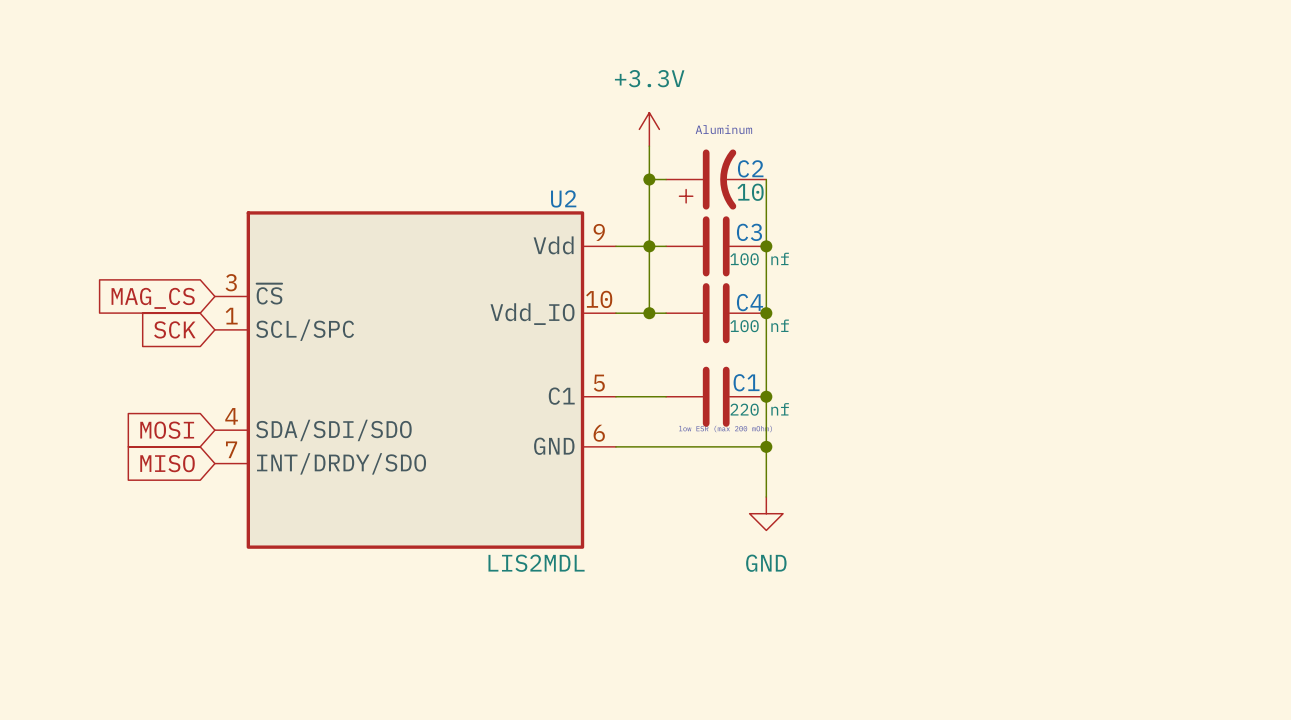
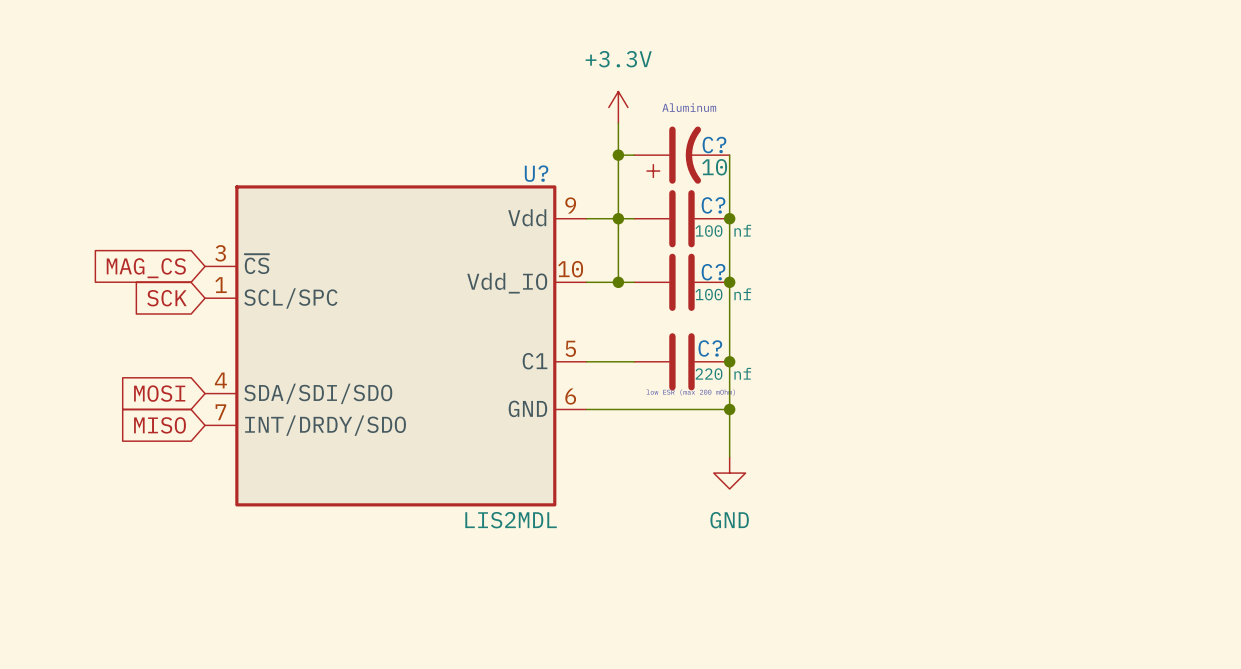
C2 name: C2 (750, 168) -> C? (714, 145)
U2 name: U2 (563, 198) -> U? (536, 173)
C3 name: C3 (749, 232) -> C? (713, 205)
C4 name: C4 (750, 302) -> C? (713, 272)
C1 name: C1 (746, 382) -> C? (710, 348)

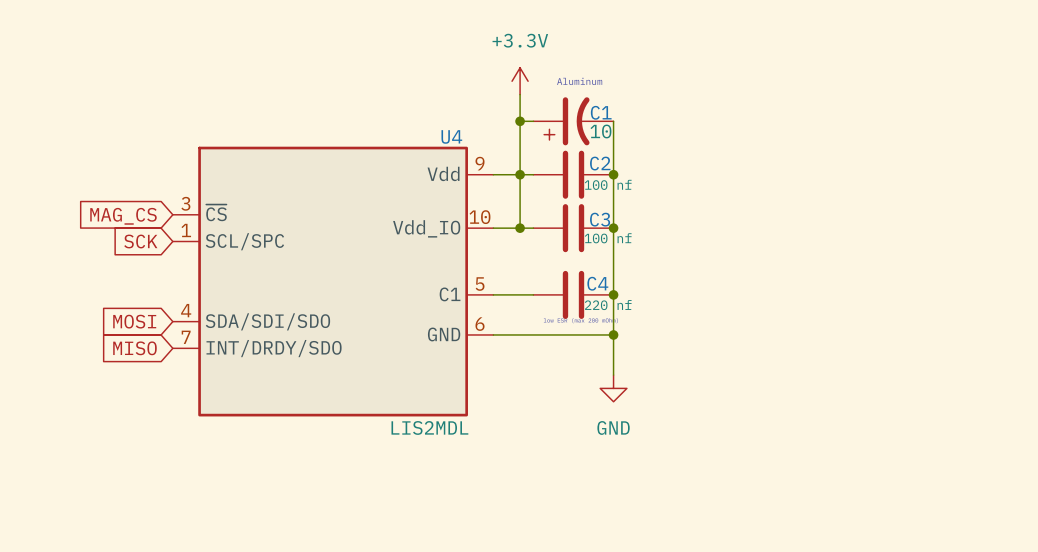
C? name: C? (714, 145) -> C1 (601, 112)
U? name: U? (536, 173) -> U4 (451, 136)
C? name: C? (713, 205) -> C2 (600, 163)
C? name: C? (713, 272) -> C3 (600, 219)
C? name: C? (710, 348) -> C4 (597, 283)

